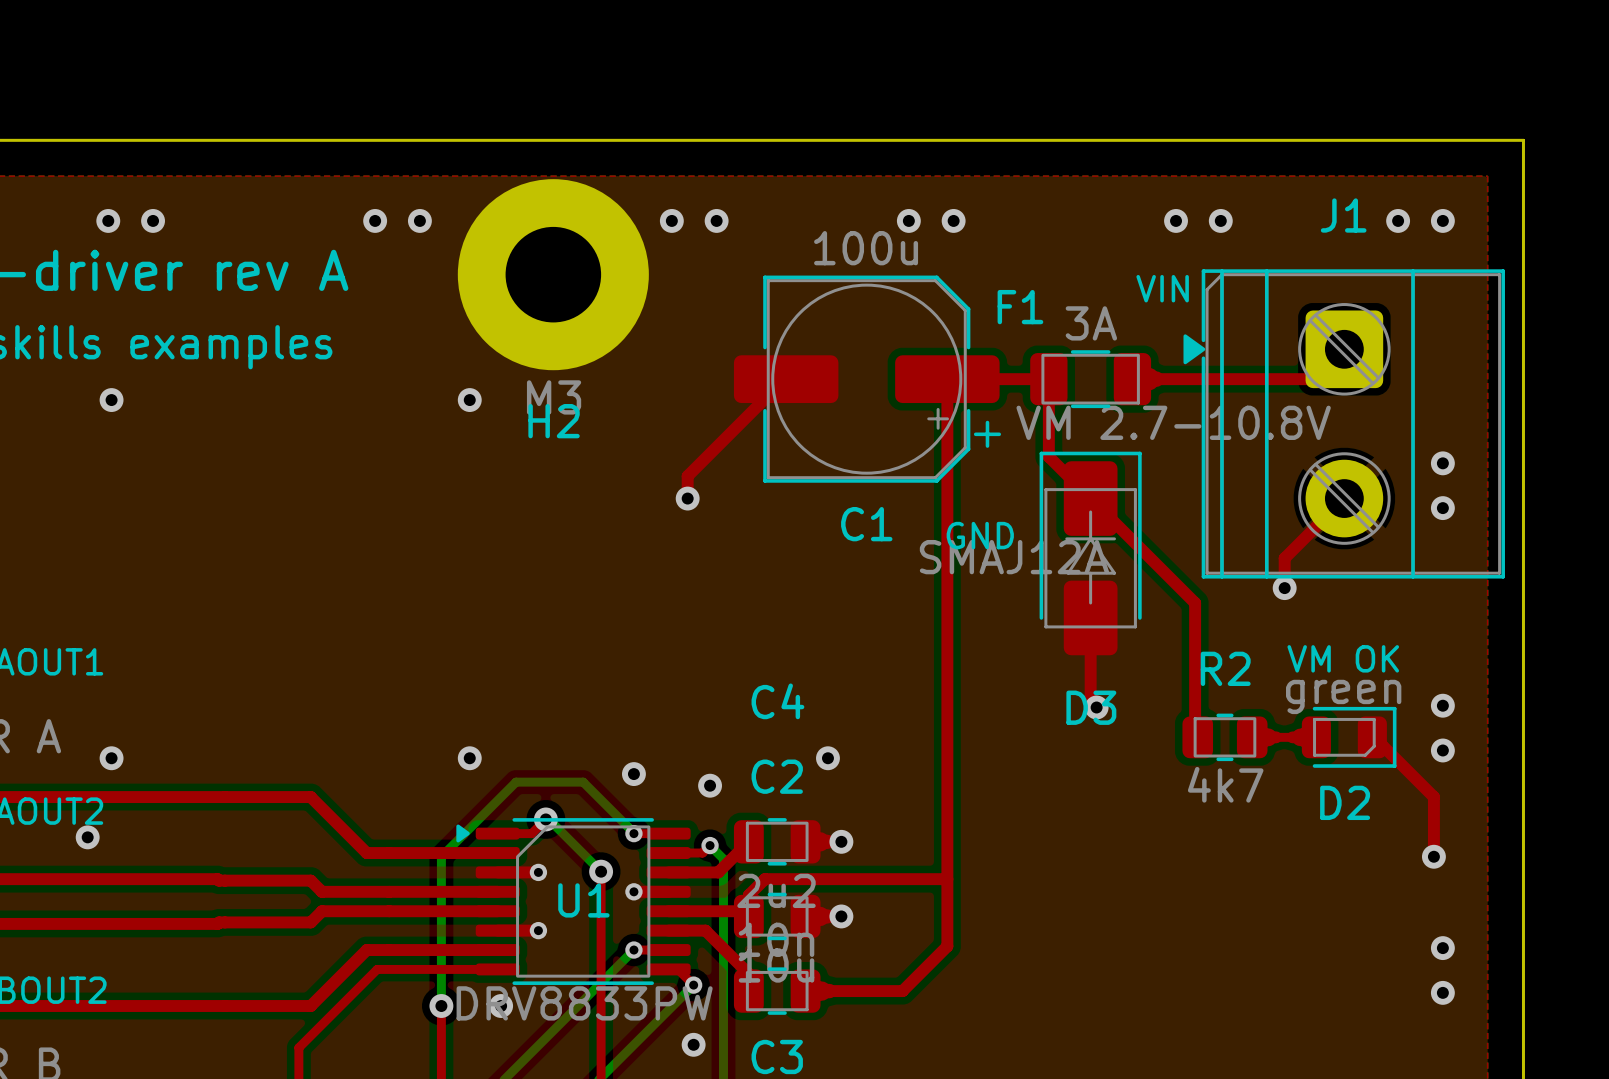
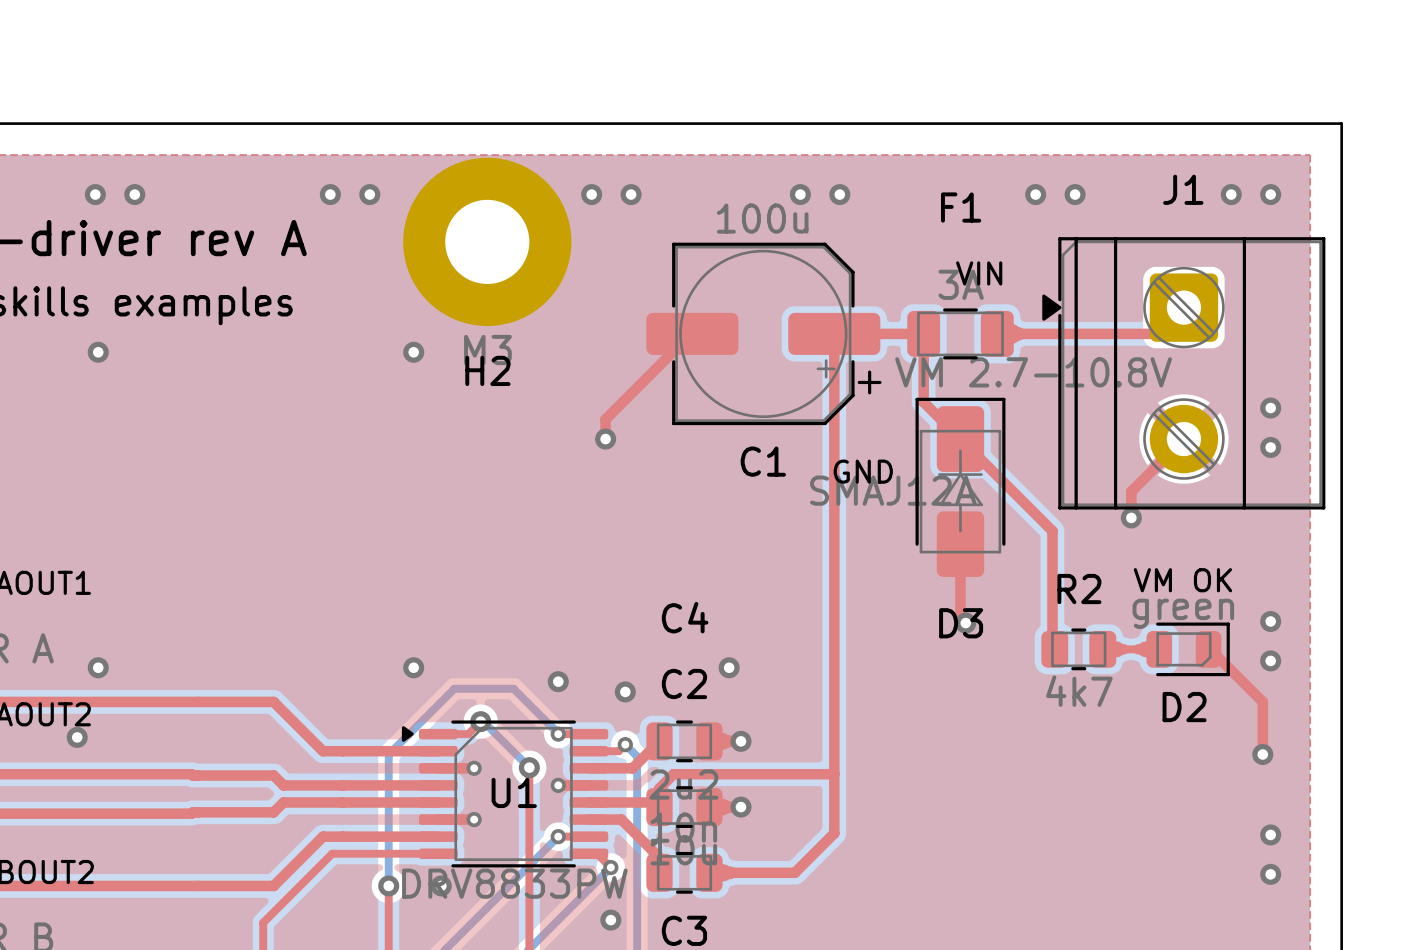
text position: VIN (1162, 288) -> VIN (979, 273)
F1 name position: F1 (1020, 307) -> F1 (961, 207)

